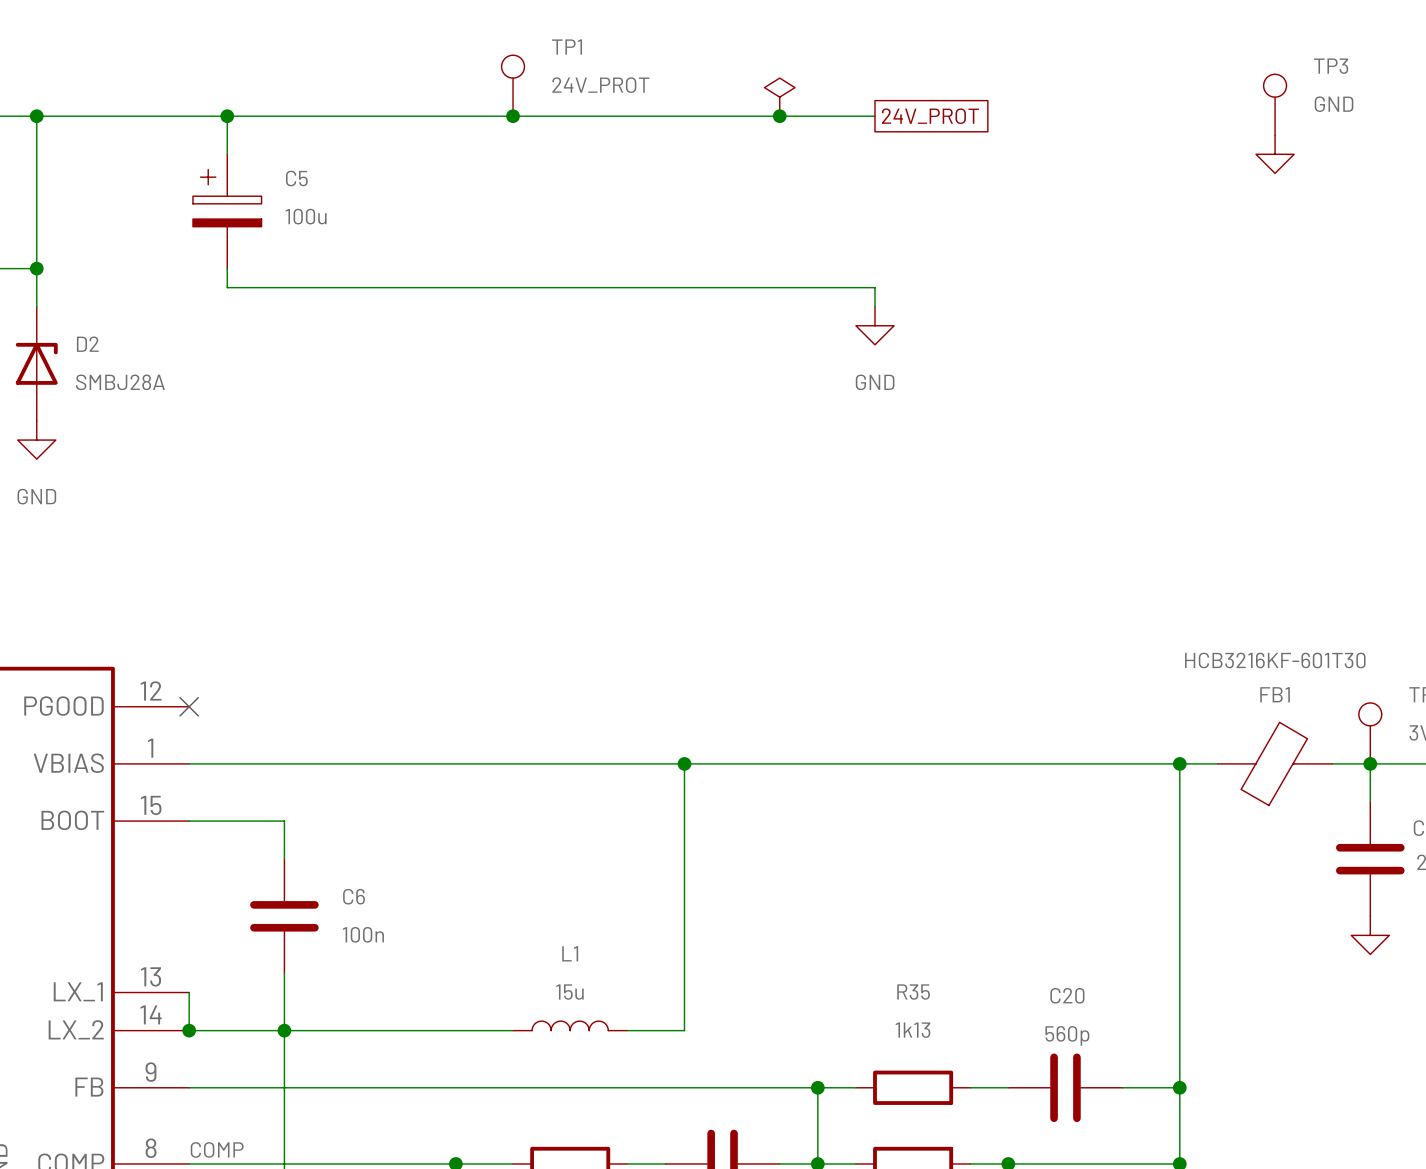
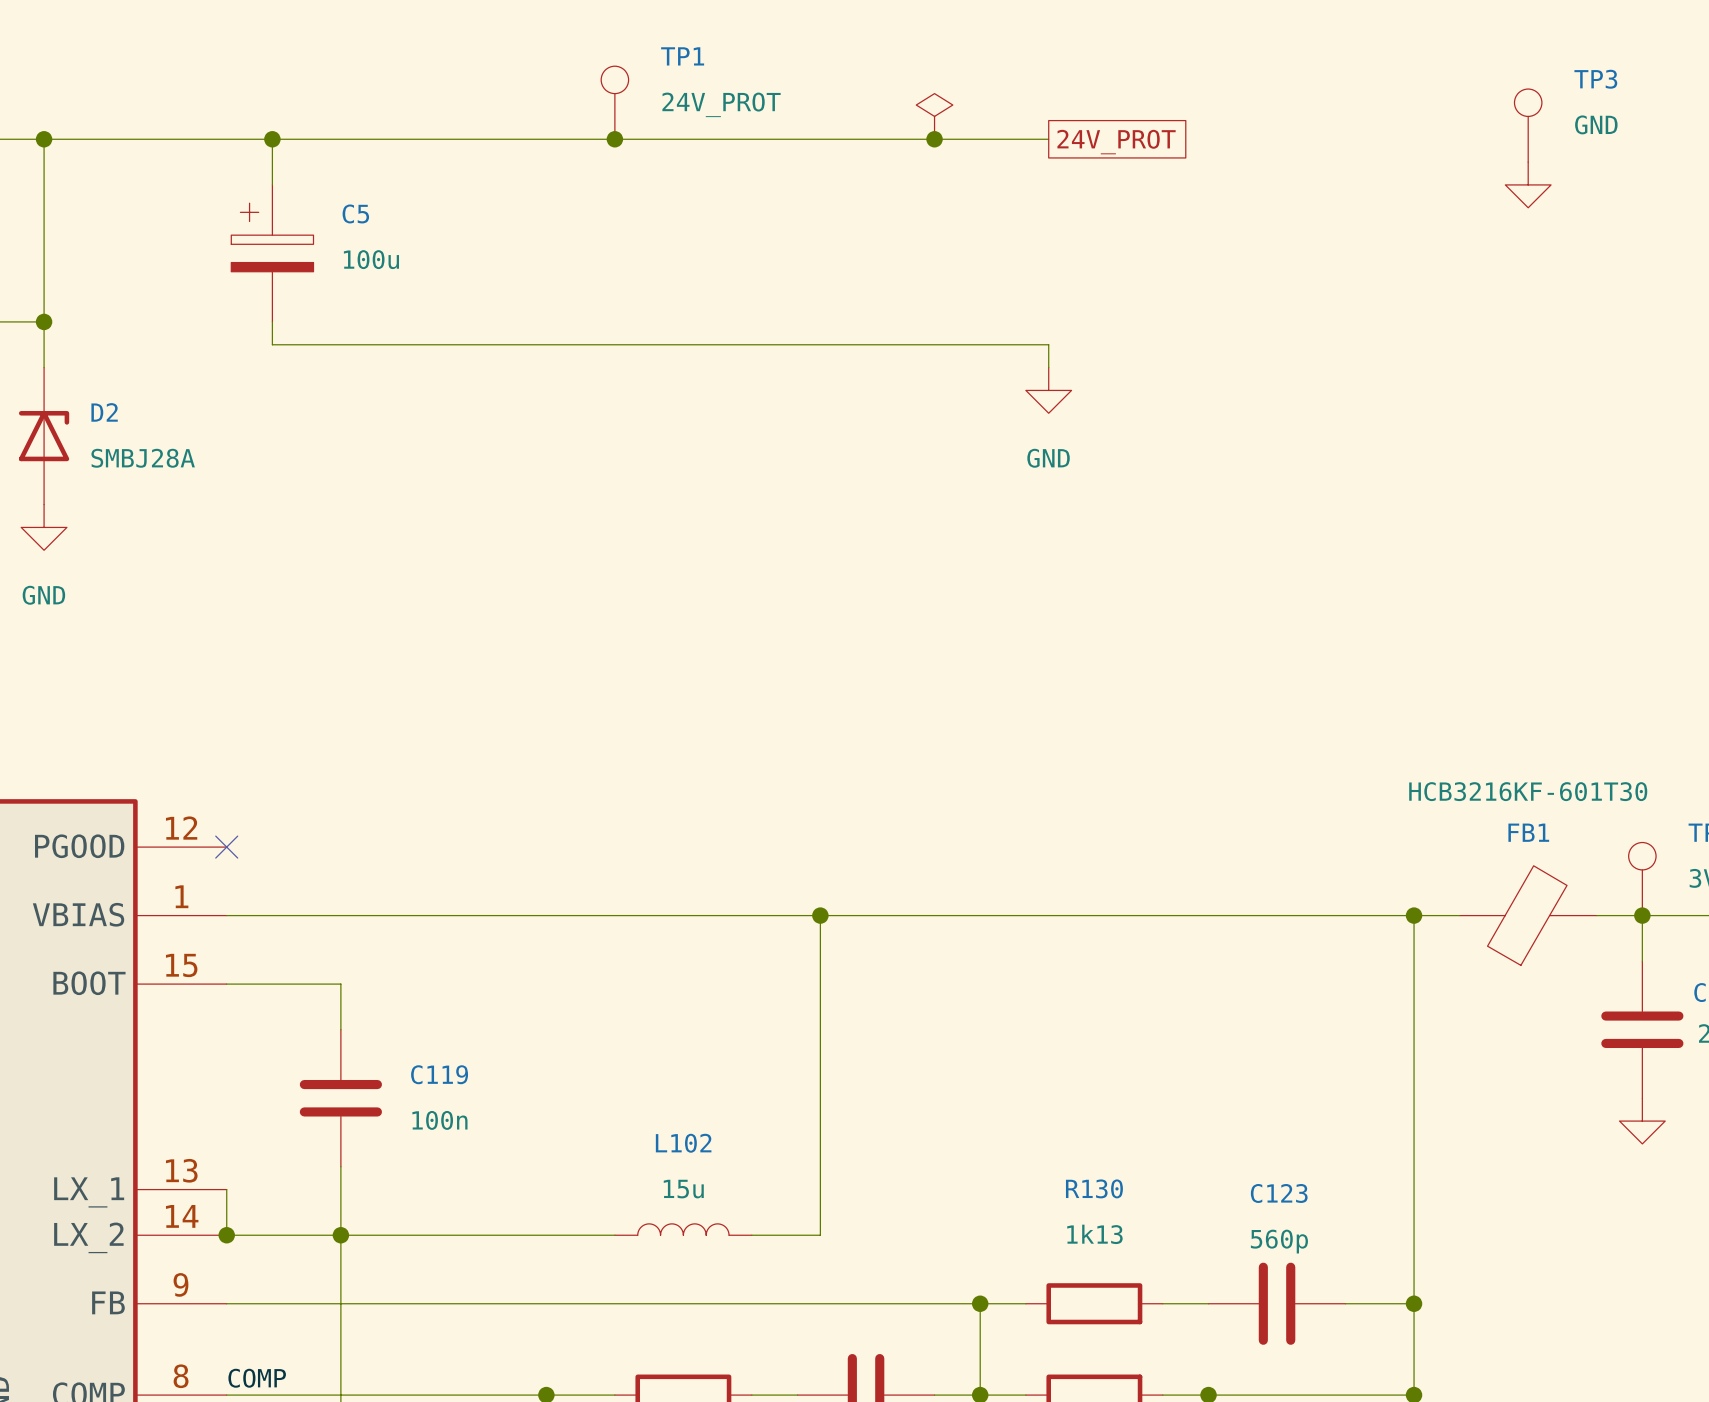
C6 name: C6 (354, 896) -> C119 (439, 1074)
L1 name: L1 (570, 953) -> L102 (683, 1143)
R35 name: R35 (913, 992) -> R130 (1094, 1188)
C20 name: C20 (1067, 995) -> C123 (1279, 1193)

